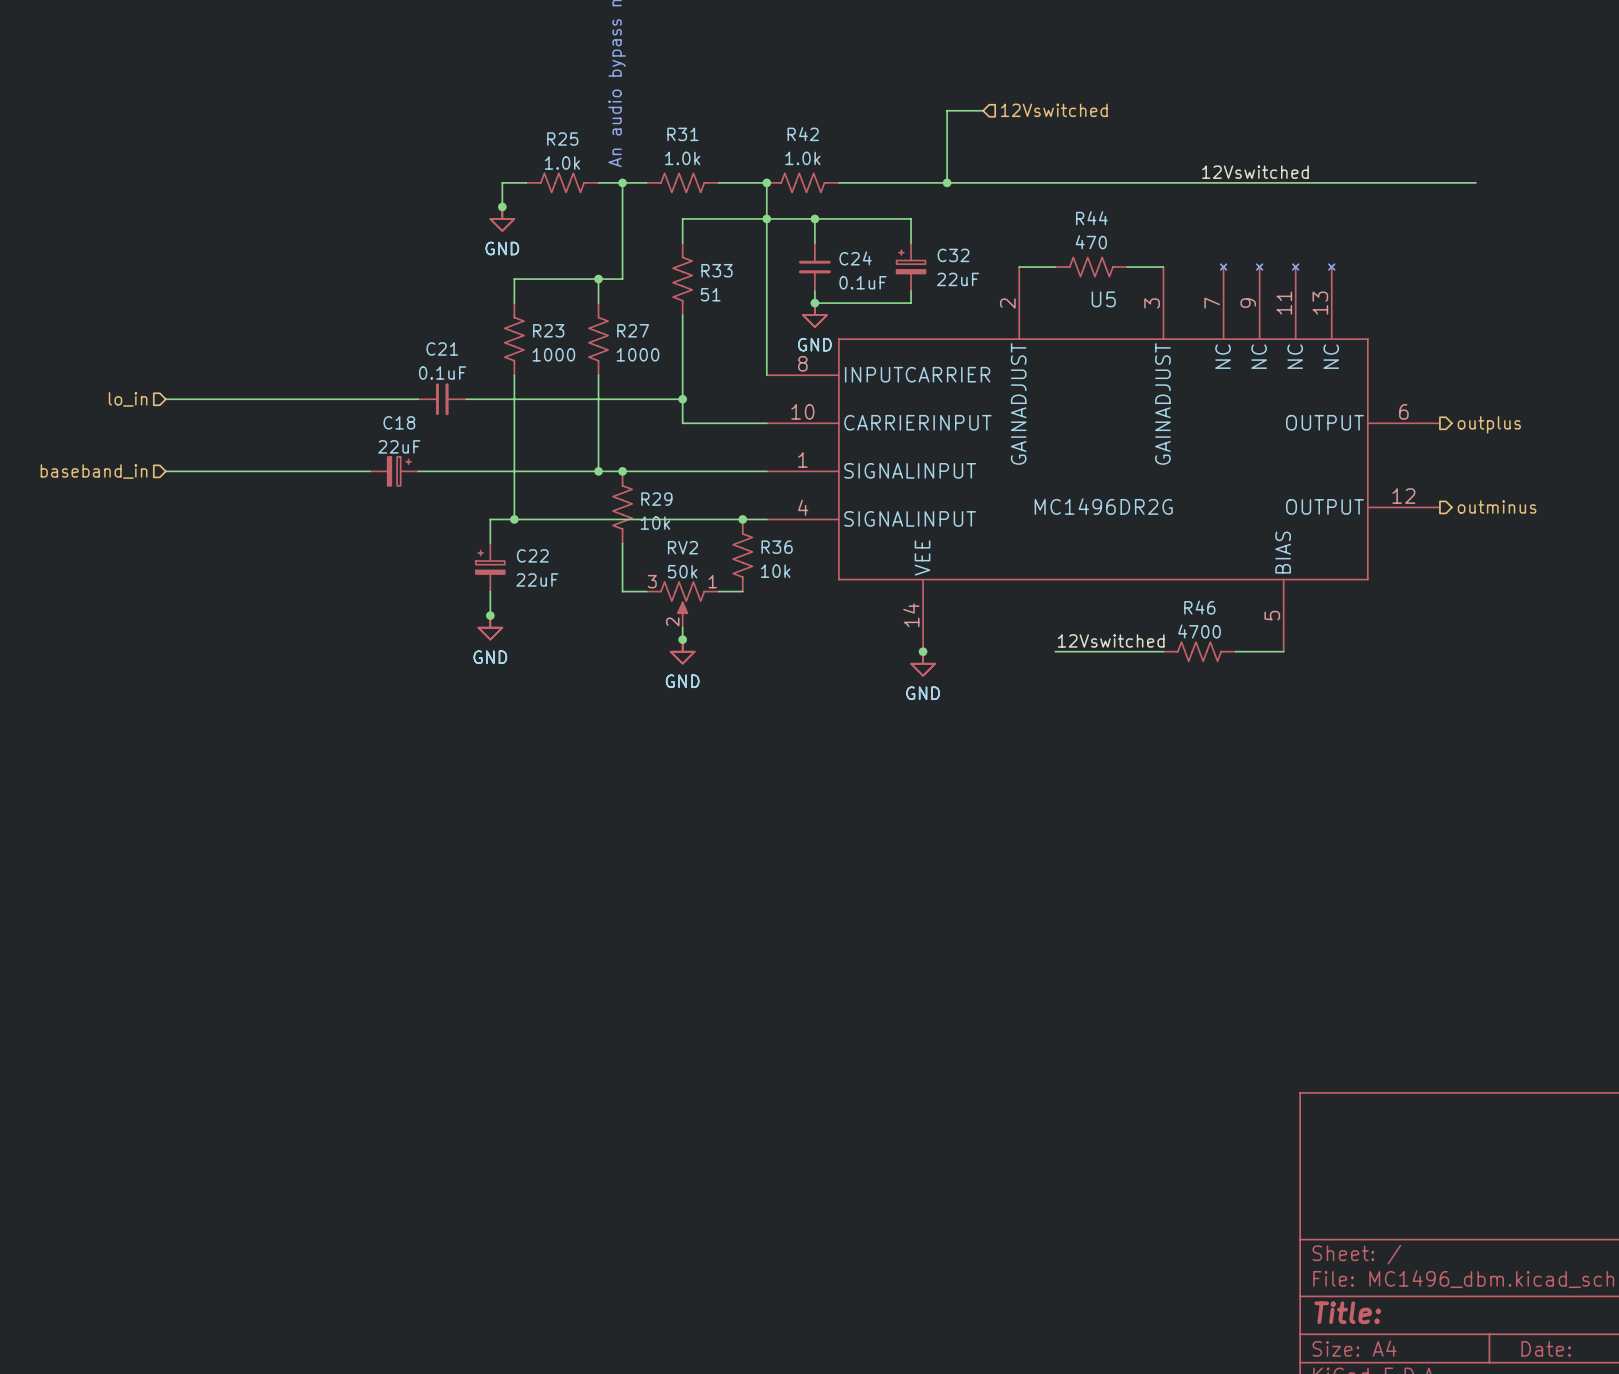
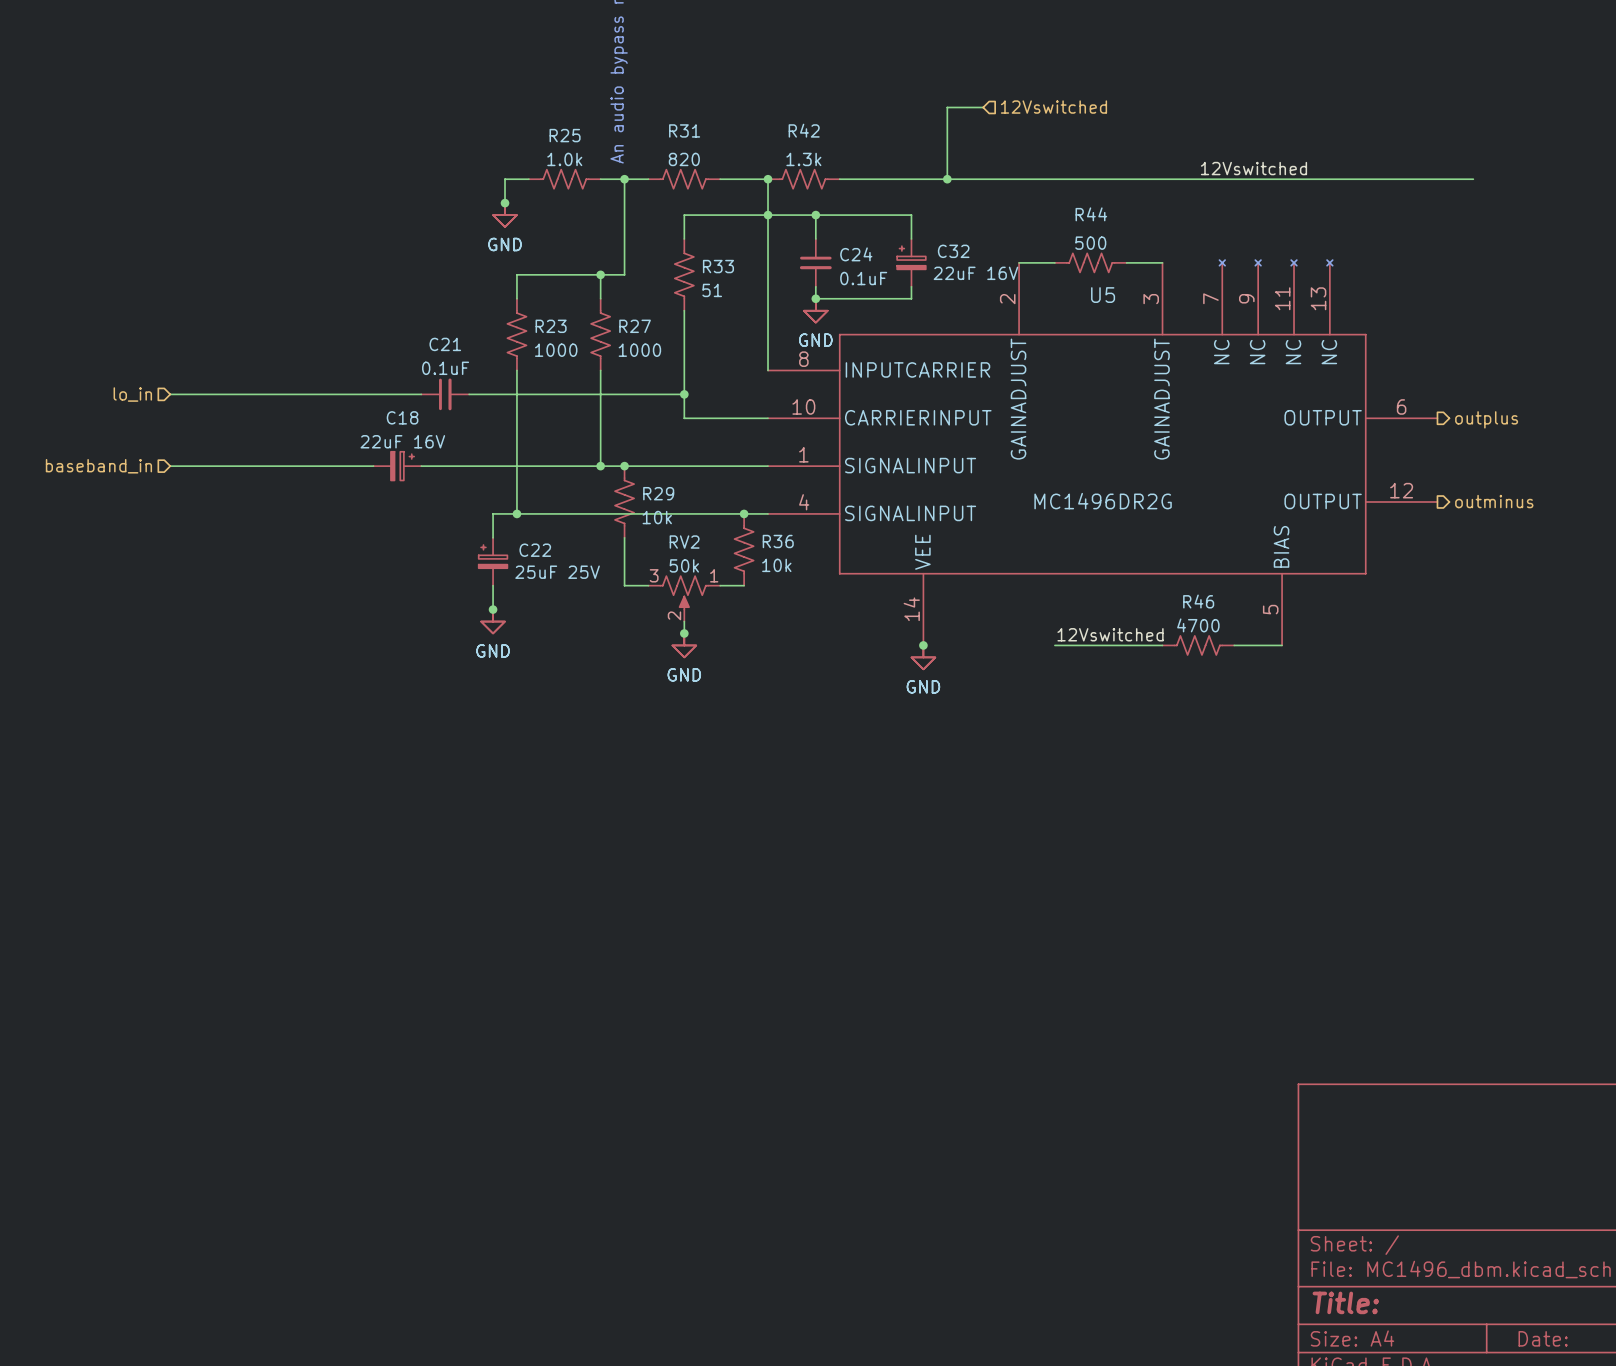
R31 value: 1.0k (682, 158) -> 820 (684, 159)
R42 value: 1.0k (802, 158) -> 1.3k (803, 159)
R44 value: 470 (1091, 242) -> 500 (1090, 243)
C32 value: 22uF (958, 279) -> 22uF 16V (975, 273)
C18 value: 22uF (399, 446) -> 22uF 16V (402, 441)
C22 value: 22uF (537, 579) -> 25uF 25V (557, 572)

